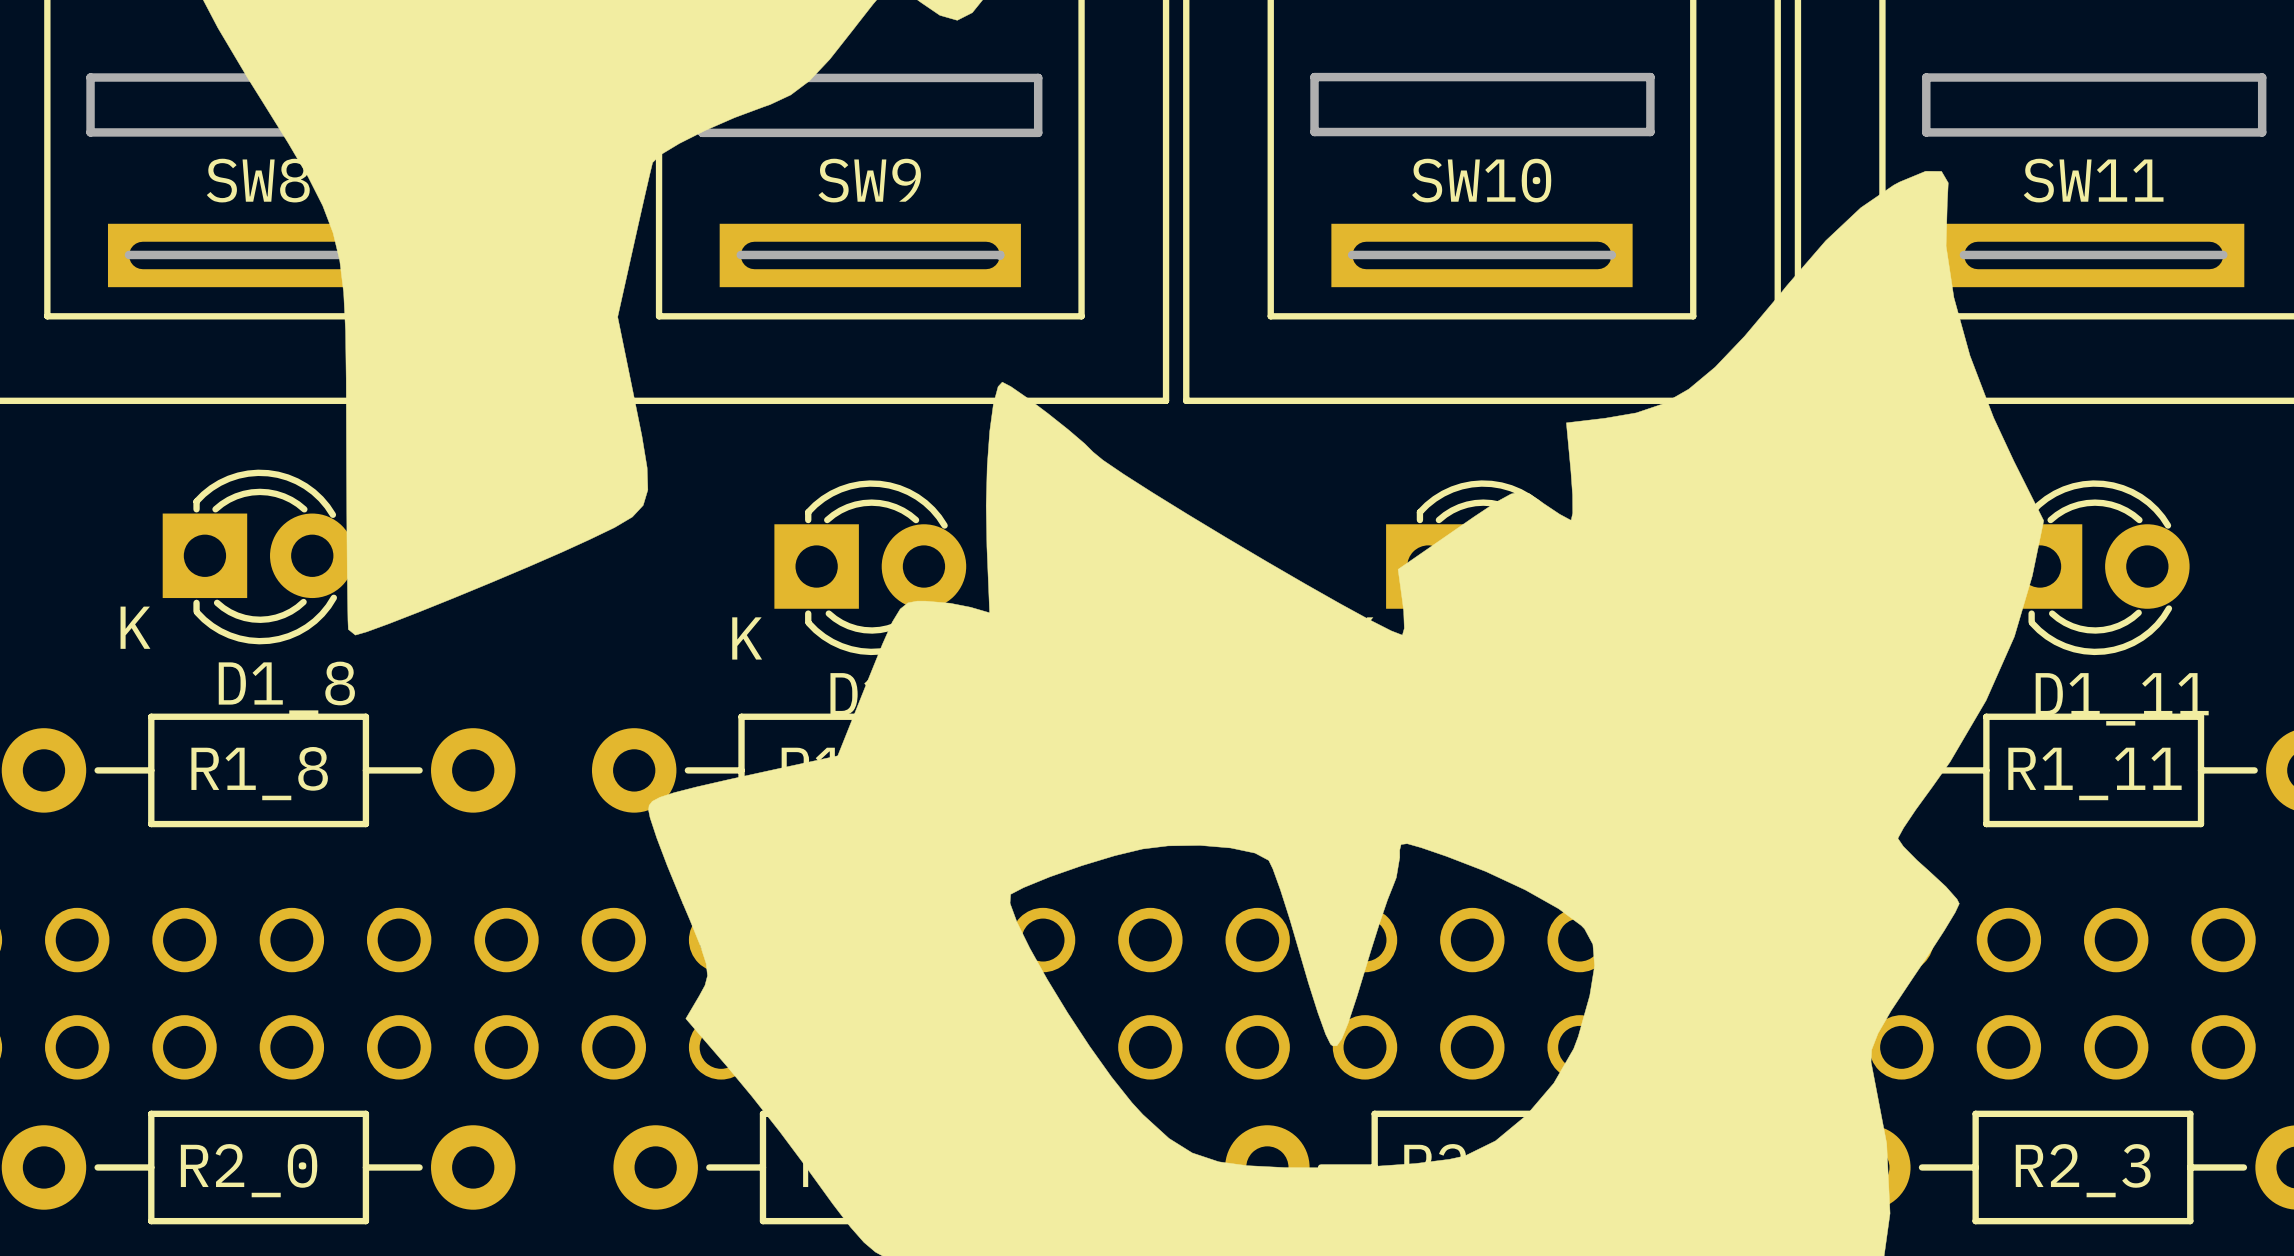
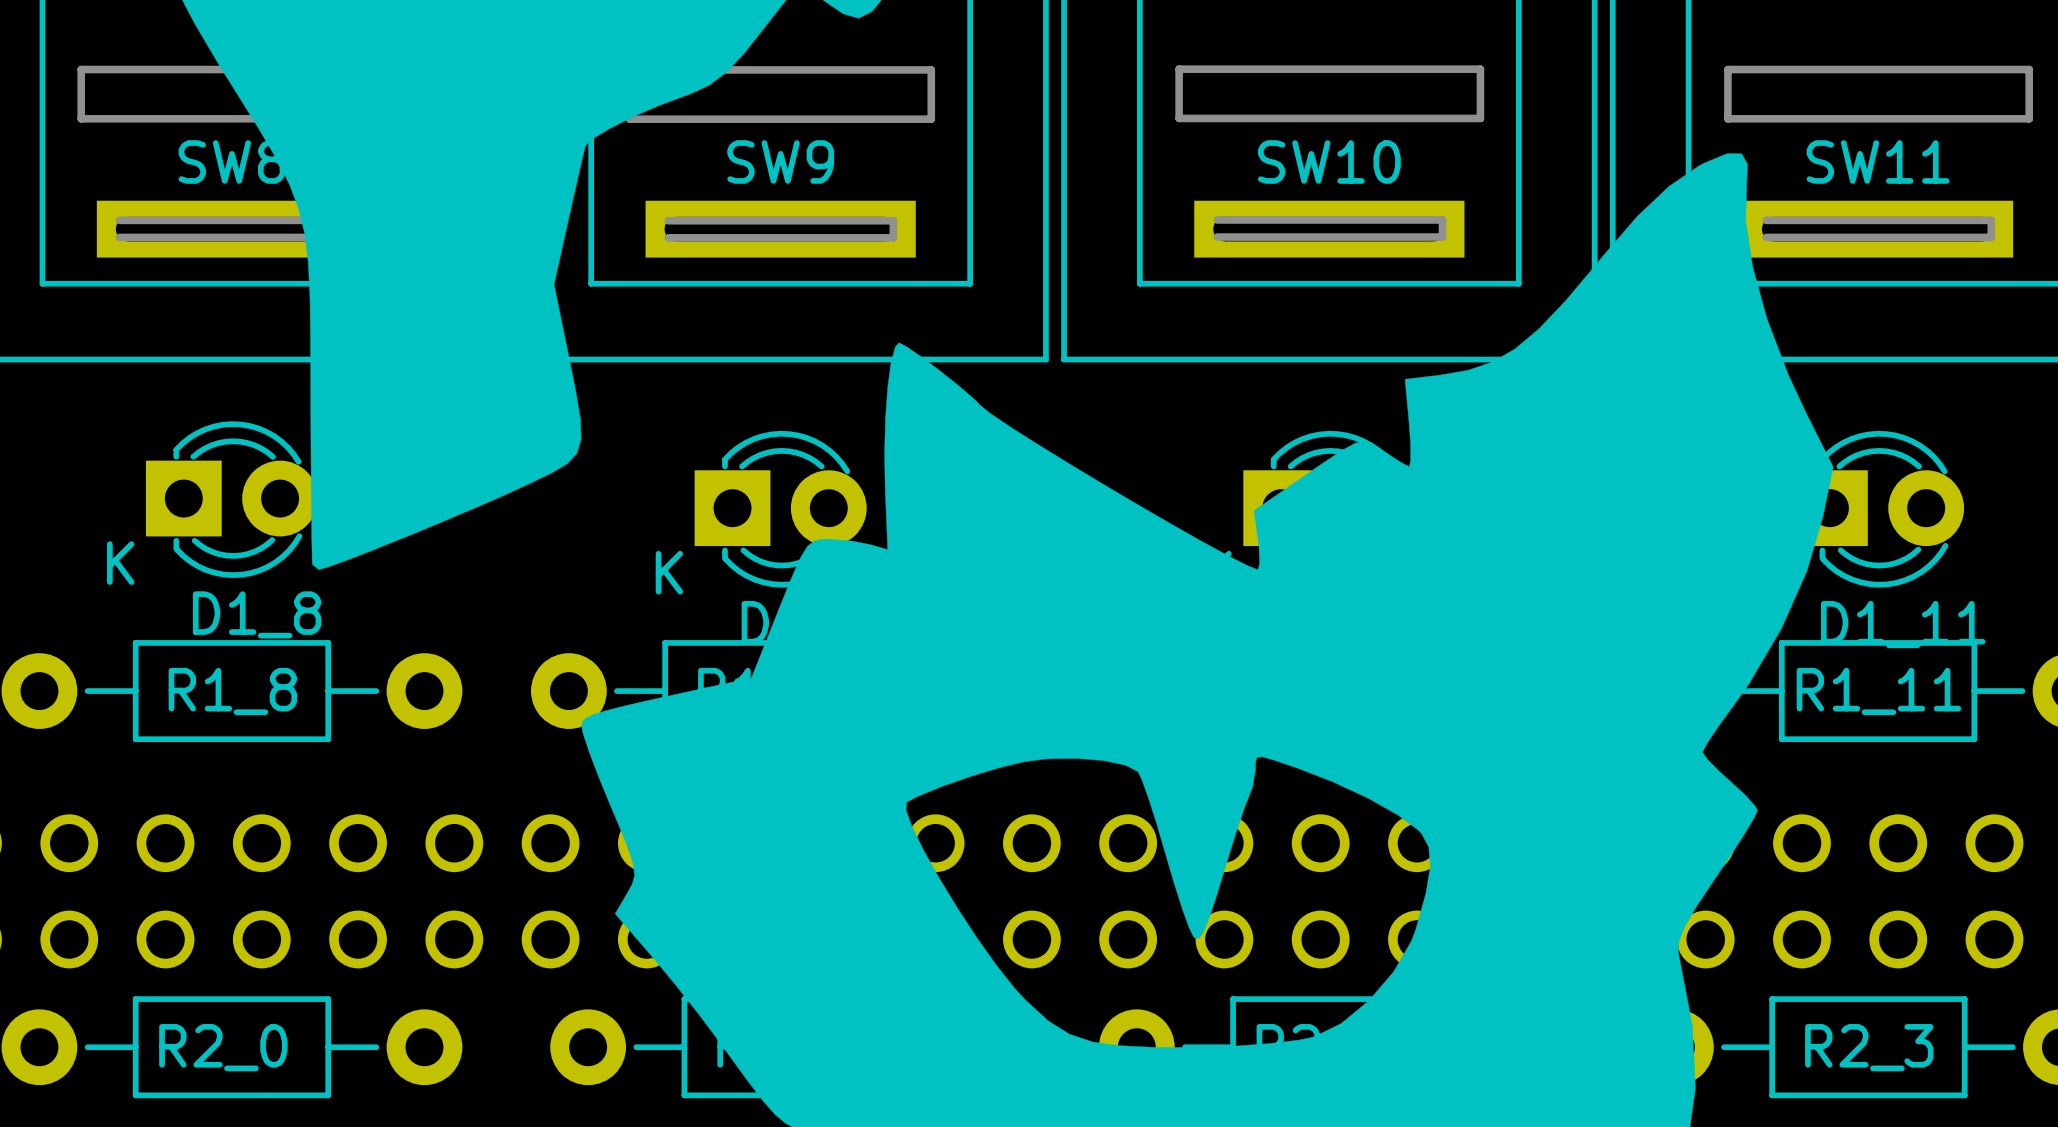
line: none -> (119, 220) (344, 220) (344, 237) (119, 237)
line: none -> (1217, 219) (1442, 219) (1442, 237) (1217, 237)
line: none -> (1766, 220) (1991, 220) (1991, 237) (1766, 237)
line: none -> (668, 220) (893, 220) (893, 237) (668, 237)
line: (128, 254) (388, 254) -> none
line: (740, 254) (1000, 254) -> none
line: (1352, 254) (1611, 254) -> none
line: (1963, 254) (2223, 254) -> none

